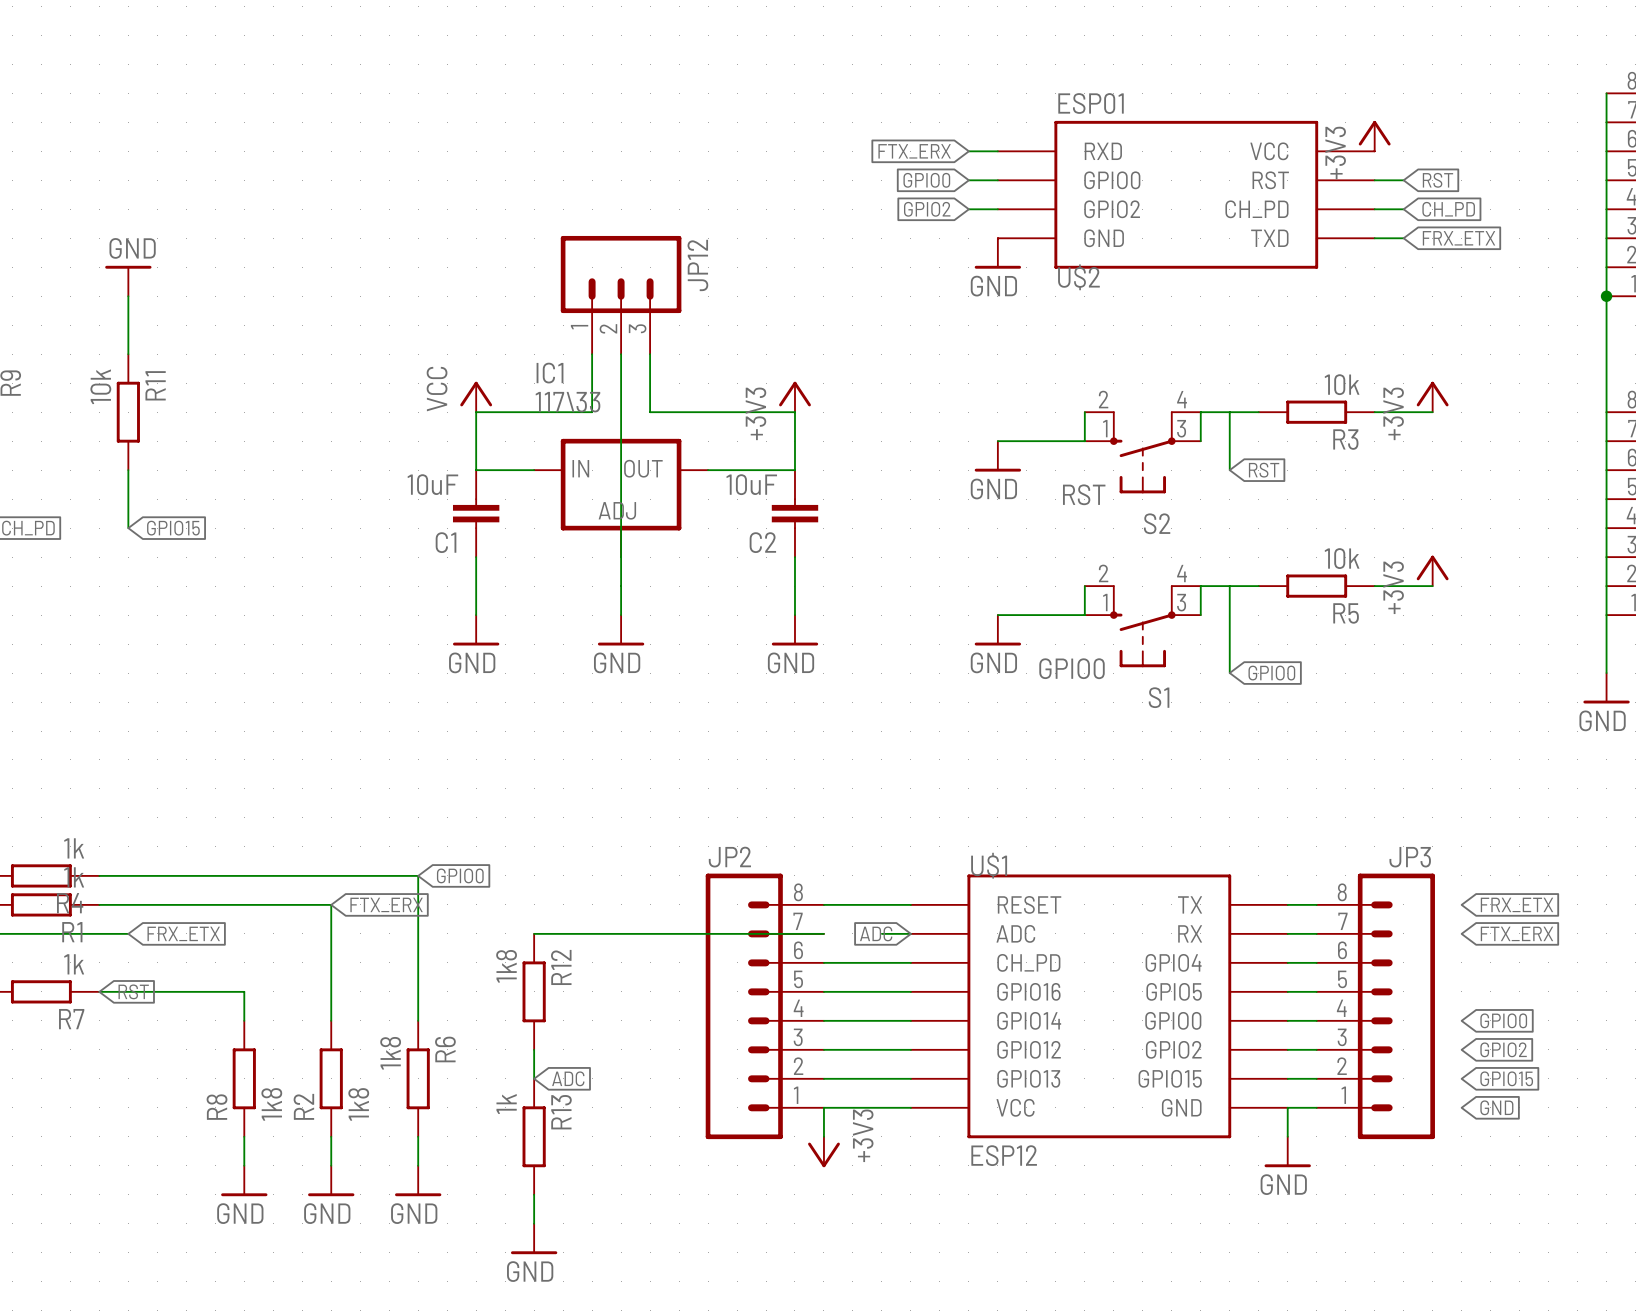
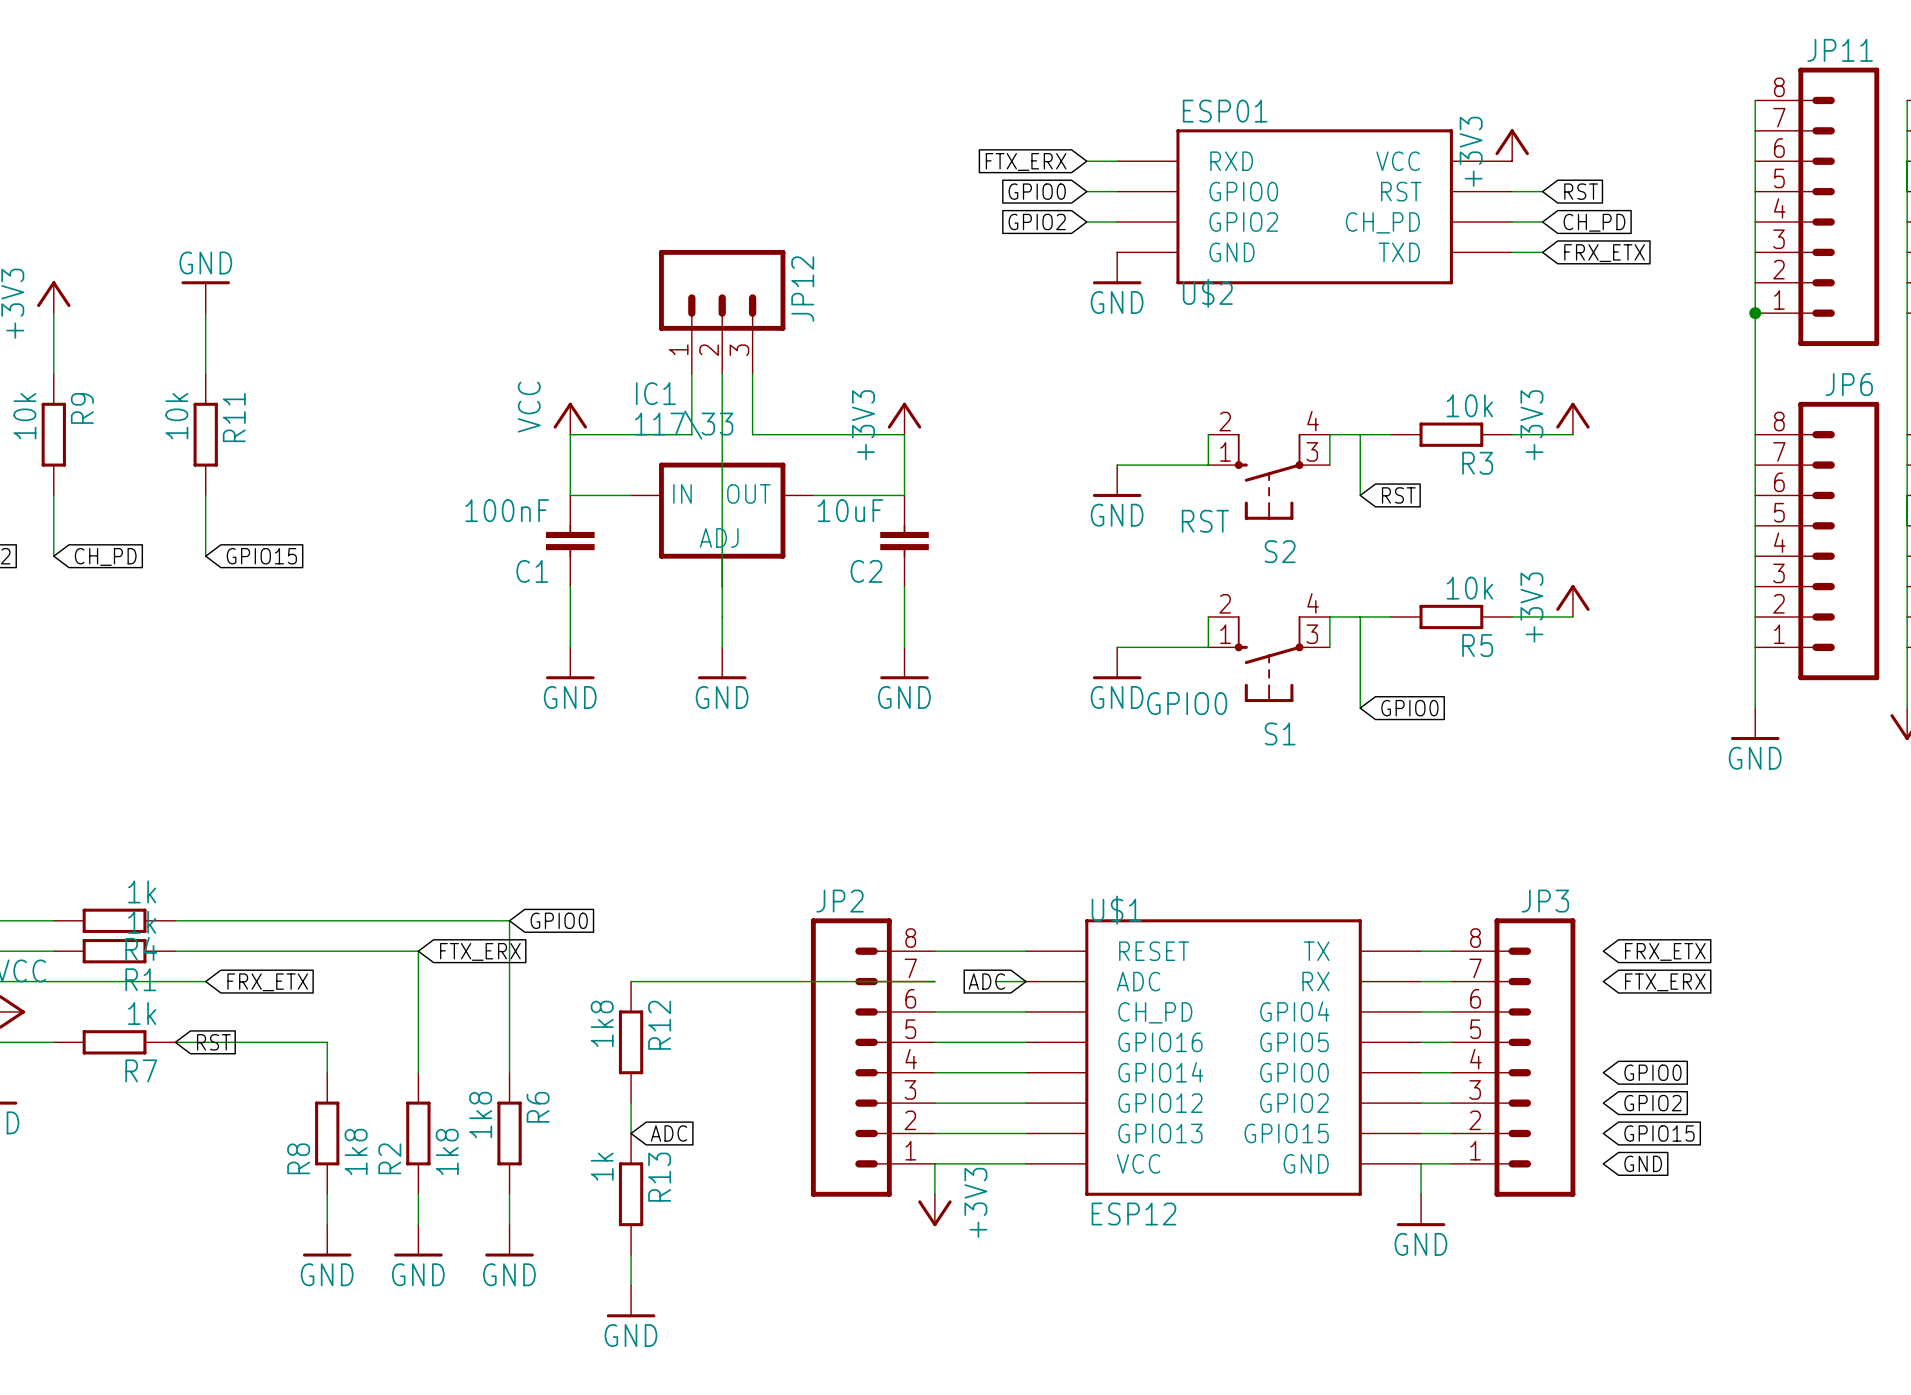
C1 value: 10uF (432, 484) -> 100nF (507, 510)

